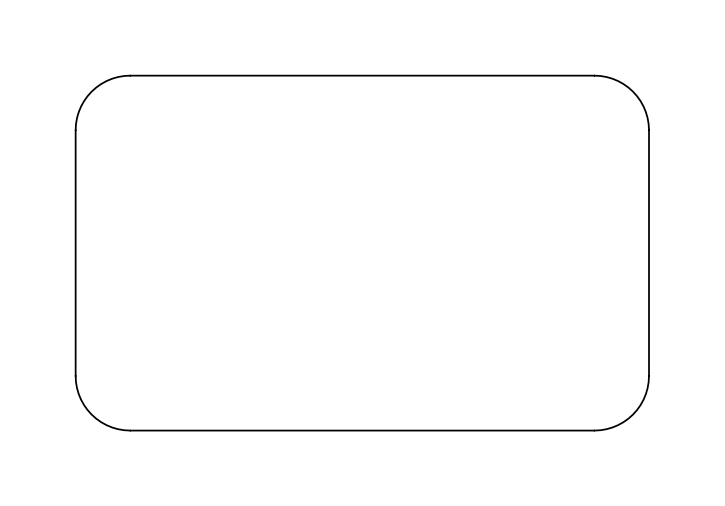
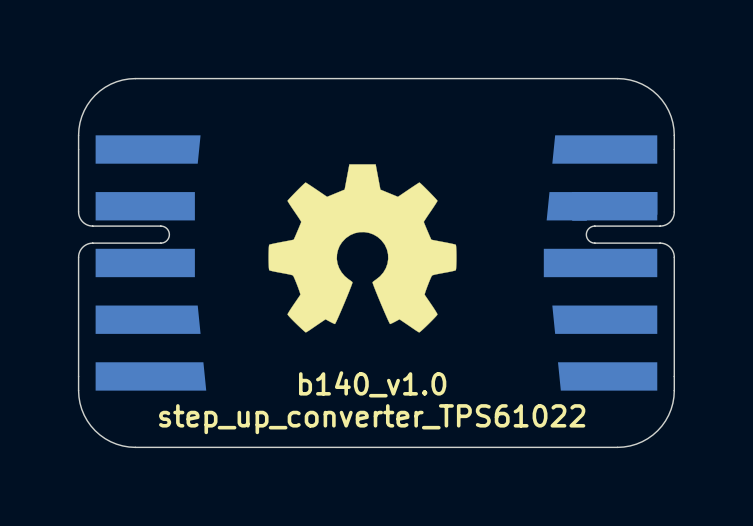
board edge: (75, 143) (75, 362) -> none
board edge: (648, 143) (648, 362) -> none
drawing: none -> [268, 164, 457, 333]
part: none -> (142, 262)
part: none -> (609, 262)
text: none -> b140_v1.0 (372, 384)
text: none -> step_up_converter_TPS61022 (372, 419)

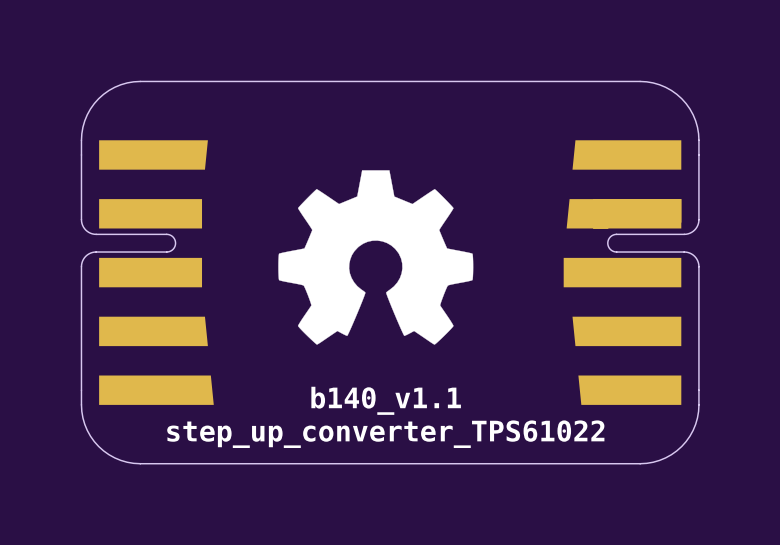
text: b140_v1.0 (372, 384) -> b140_v1.1 (386, 400)

